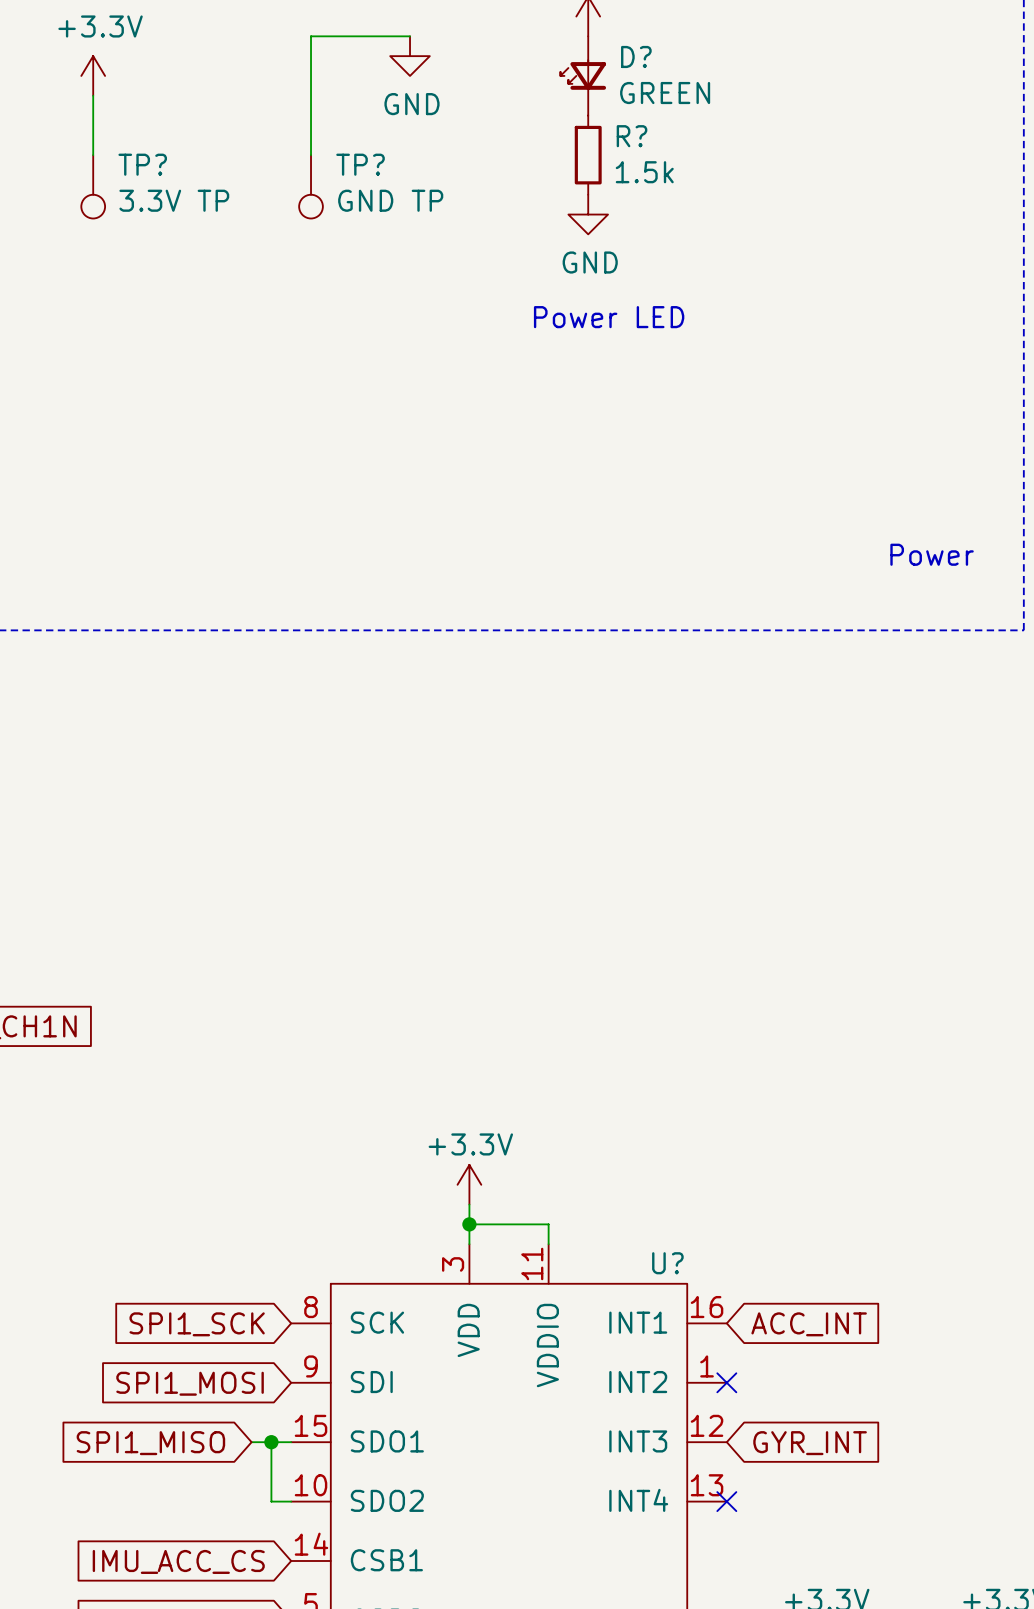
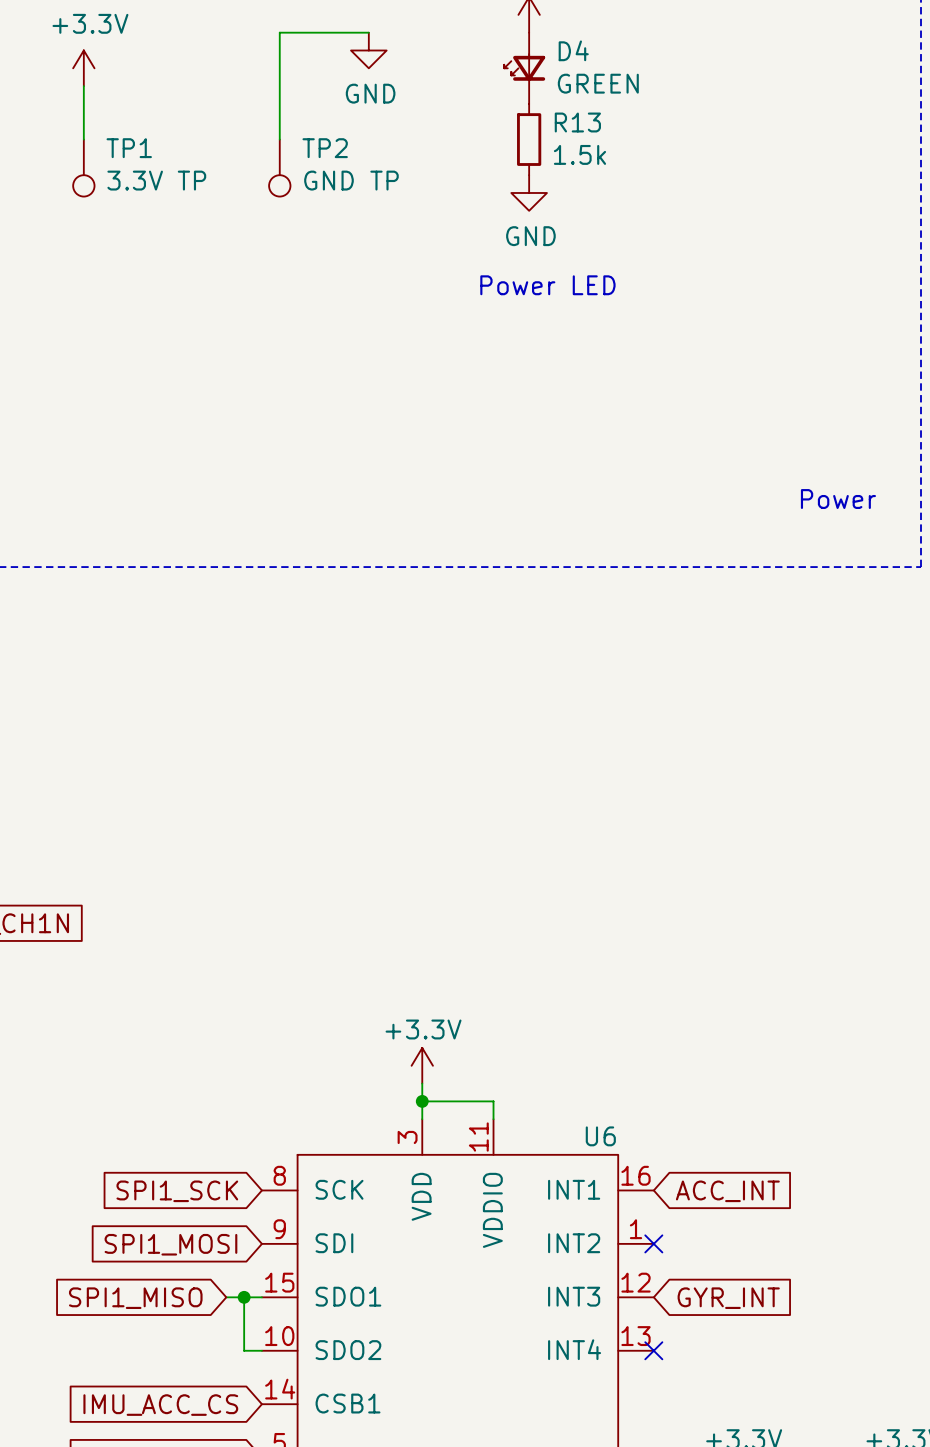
D? name: D? (636, 56) -> D4 (573, 50)
R? name: R? (632, 136) -> R13 (577, 122)
TP? name: TP? (142, 164) -> TP1 (129, 148)
TP? name: TP? (360, 164) -> TP2 (325, 148)
U? name: U? (667, 1263) -> U6 (600, 1136)

